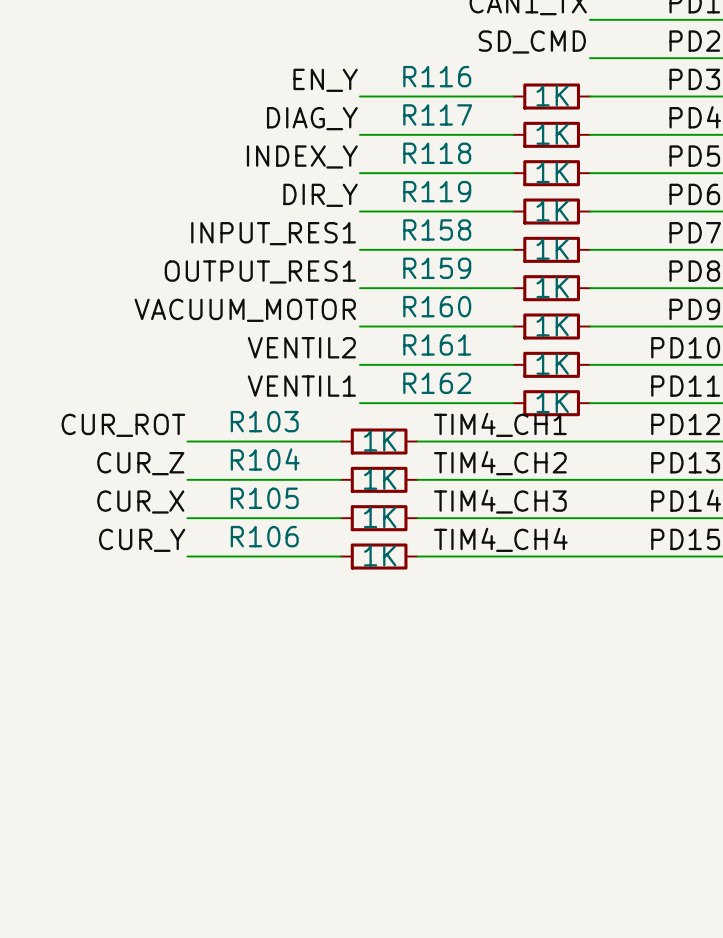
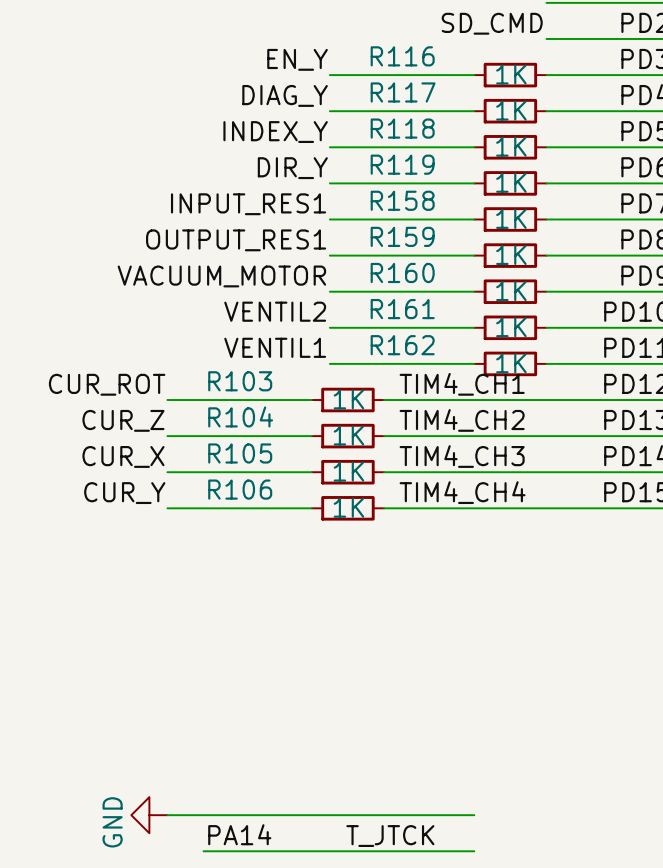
power symbol: none -> GND (149, 815)
wire: none -> (167, 815) (474, 815)
label: none -> PA14 (239, 834)
label: none -> T_JTCK (390, 836)
wire: none -> (203, 851) (474, 851)

